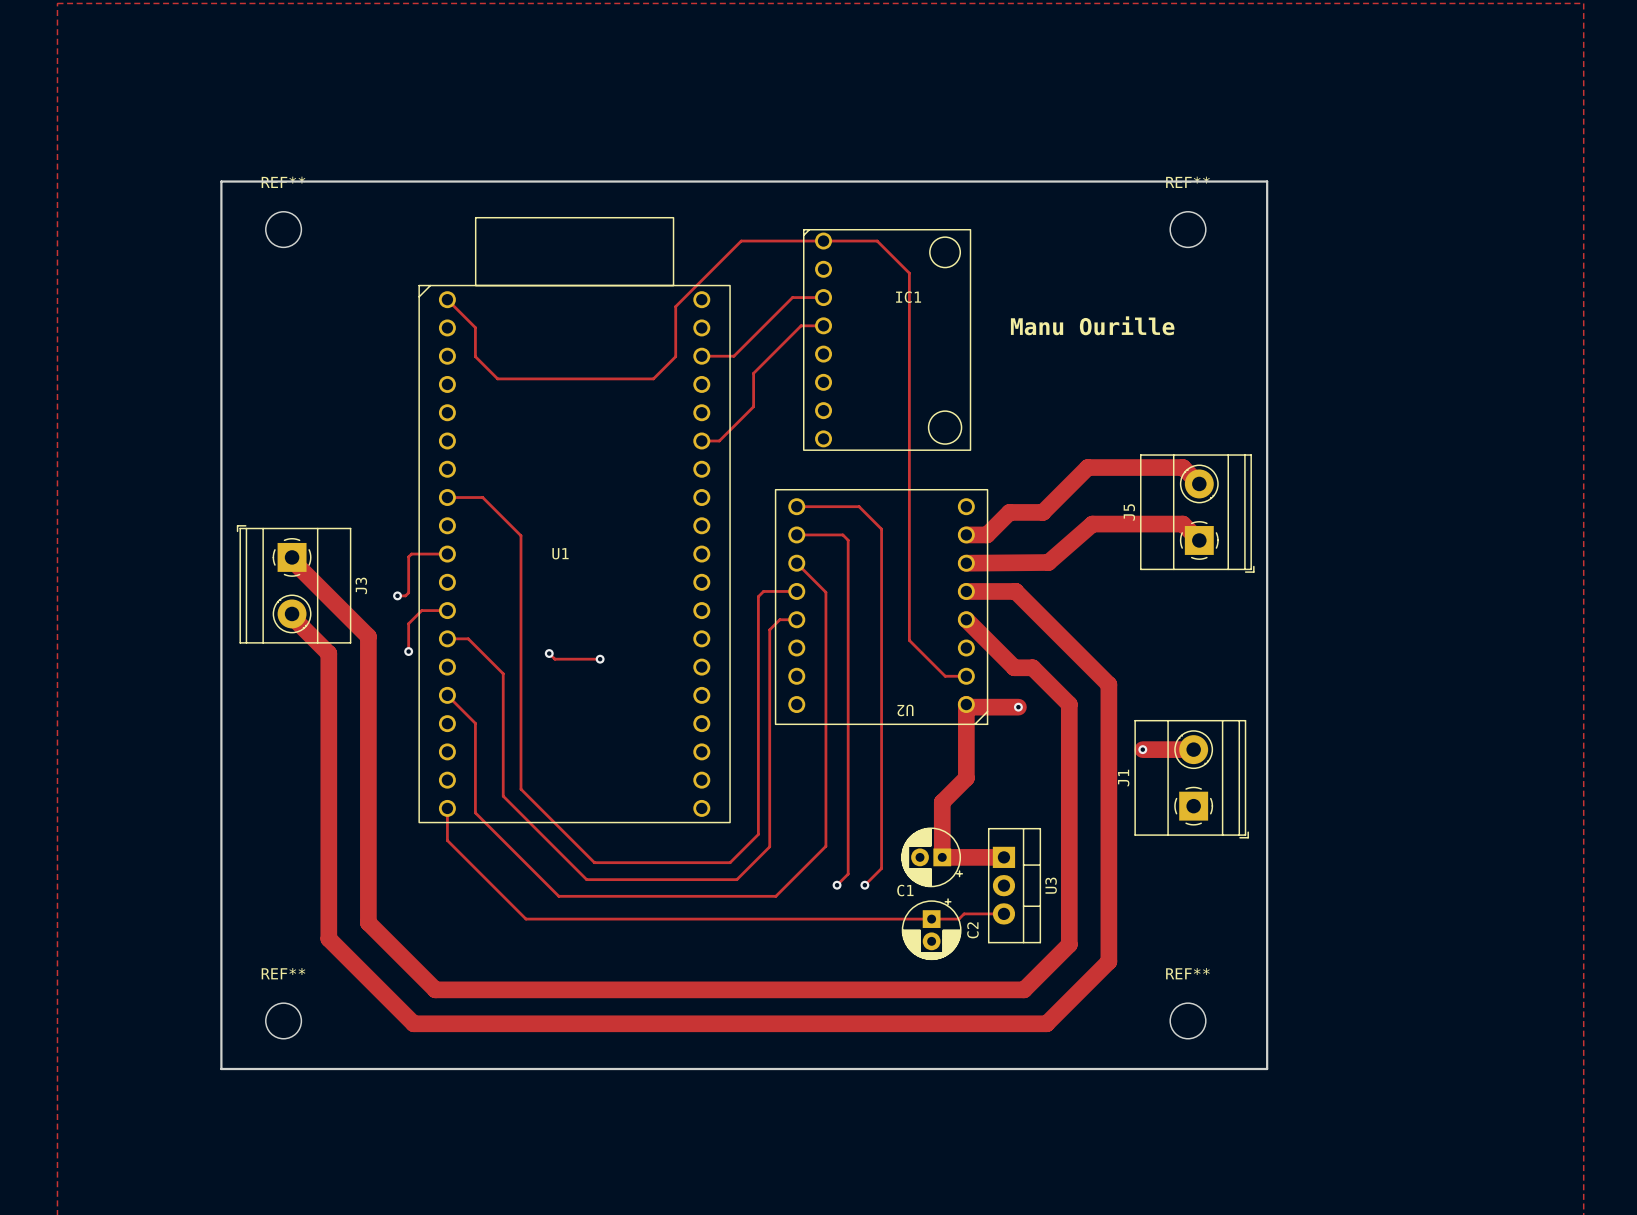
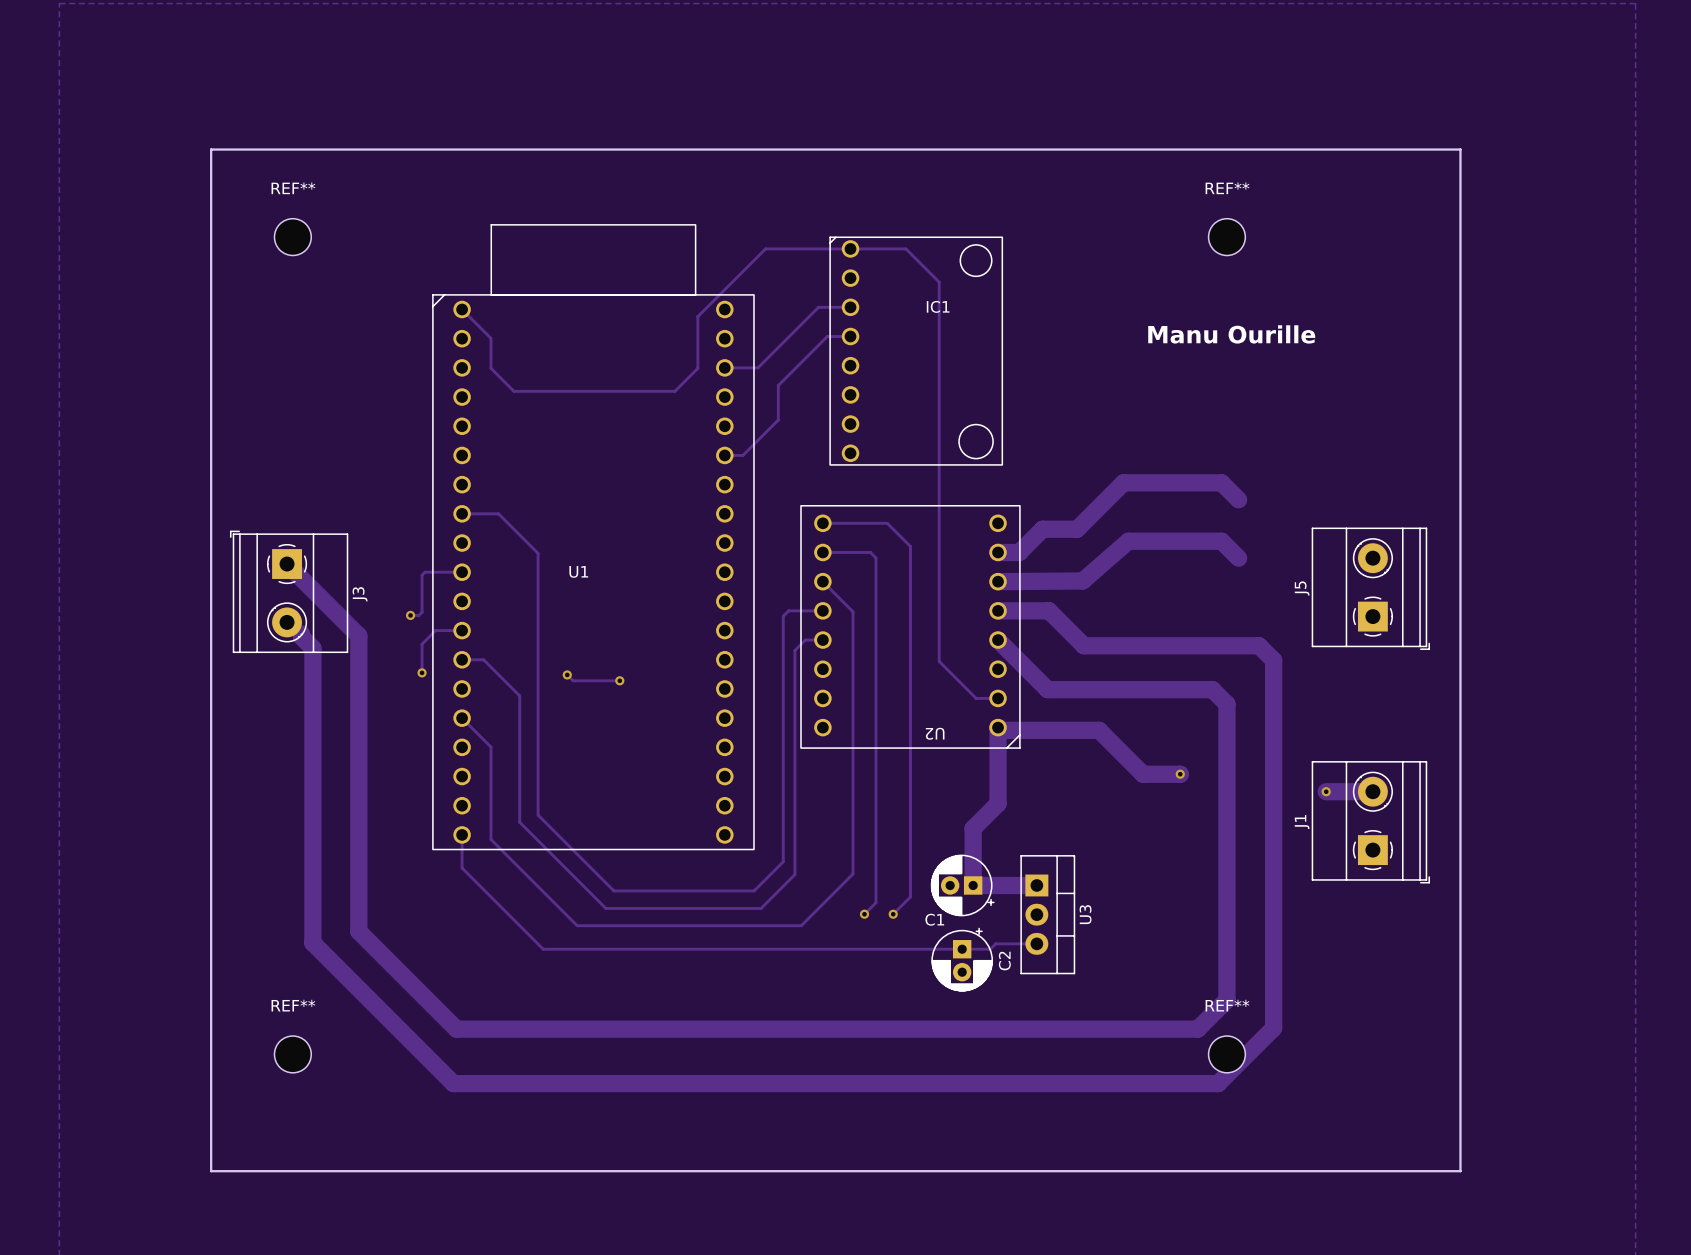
board edge: (221, 181) (1267, 181) (1267, 1069) (221, 1069) (221, 181) -> (211, 149) (211, 1171) (1460, 1171) (1460, 149) (211, 149)
text position: Manu Ourille (1092, 325) -> Manu Ourille (1231, 334)
J5 position: (1197, 513) -> (1370, 588)
J3 position: (294, 584) -> (289, 591)
track: (347, 615) (368, 636) (368, 922) -> (358, 635) (358, 931) (380, 953)
track: (1049, 625) (1108, 684) (1108, 961) (1046, 1023) (413, 1023) -> (1083, 645) (1259, 645) (1273, 660) (1273, 1028) (1218, 1083) (453, 1083) (427, 1057)
track: (302, 627) (328, 653) (328, 938) -> (312, 648) (312, 942) (339, 969)
track: (1032, 667) (1069, 704) (1069, 944) (1024, 989) (435, 989) -> (1066, 689) (1212, 689) (1226, 704) (1226, 999) (1197, 1029) (456, 1029) (449, 1022)
via: (1018, 707) -> none
track: (1142, 749) (1193, 749) -> (1180, 774) (1143, 774) (1099, 730) (1051, 730)
track: none -> (1326, 791) (1372, 791)
via: none -> (1326, 791)
J1 position: (1191, 779) -> (1370, 822)

